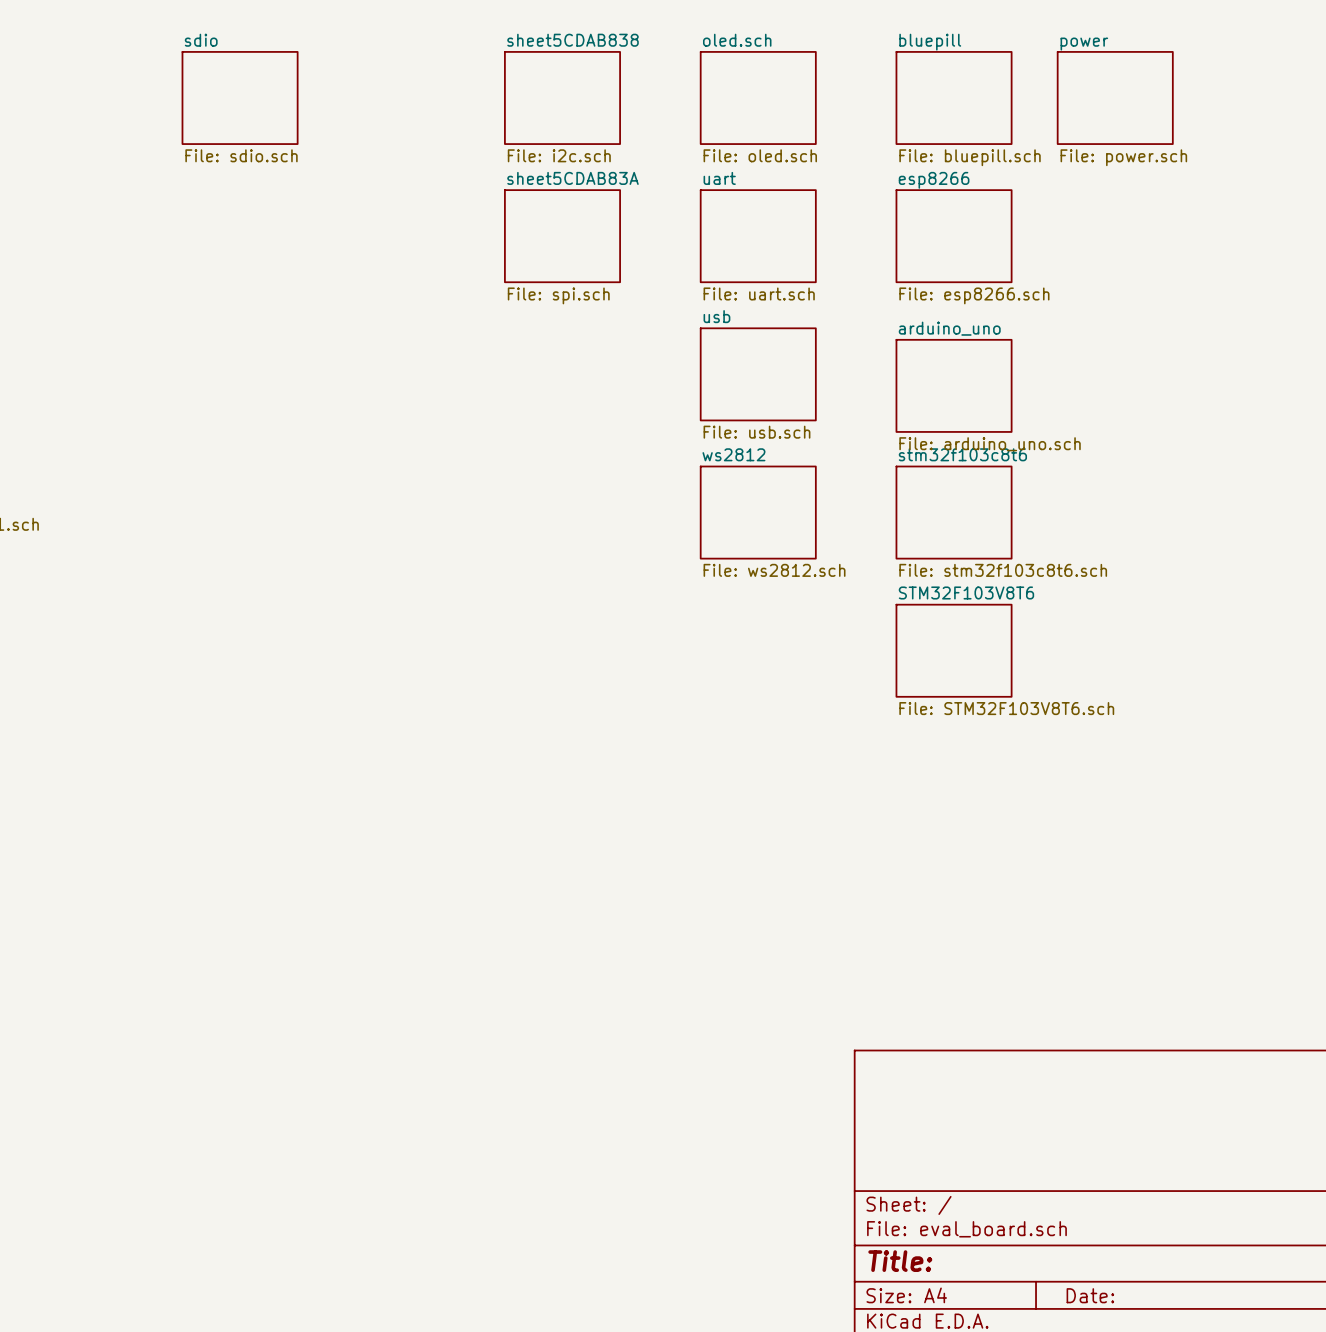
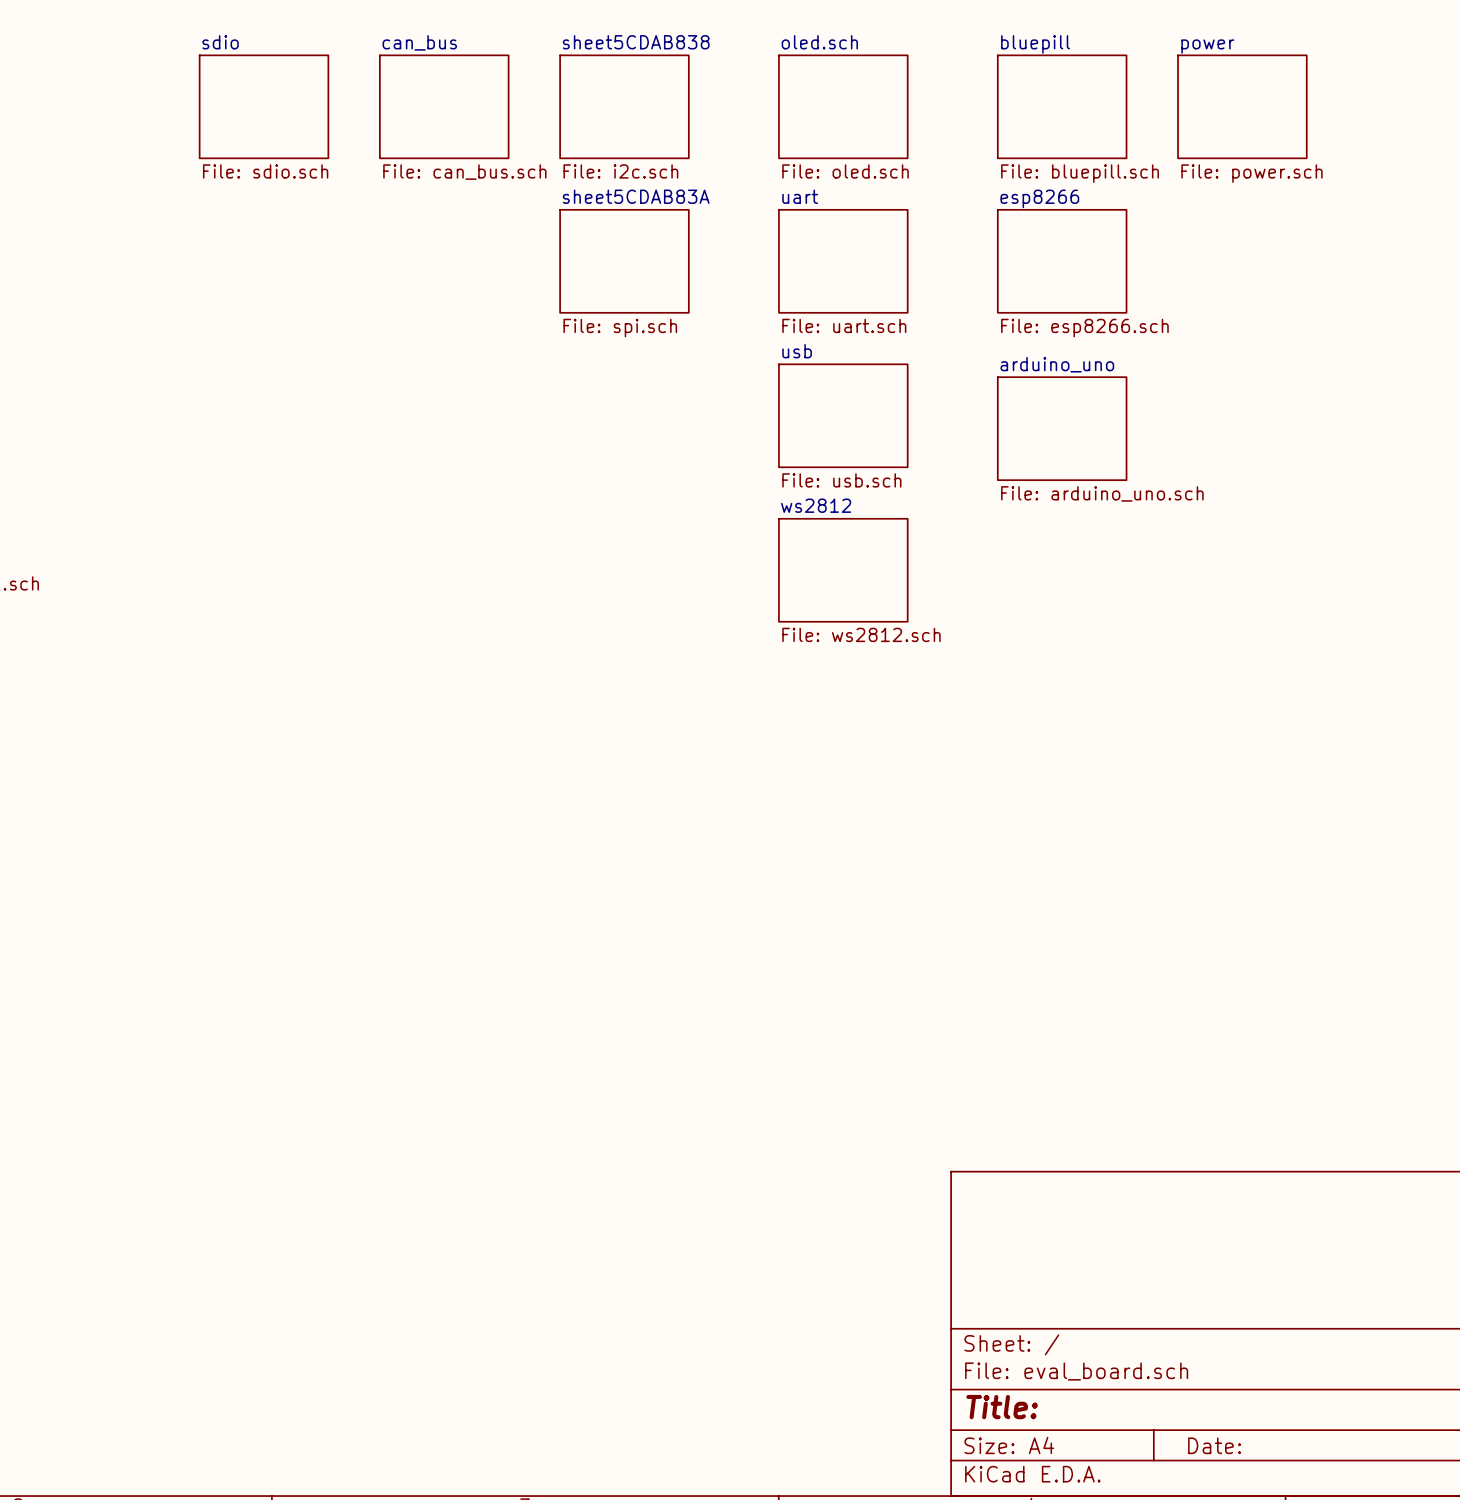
sheet can_bus: none -> File: can_bus.sch (444, 106)
sheet stm32f103c8t6: File: stm32f103c8t6.sch (954, 512) -> none
sheet STM32F103V8T6: File: STM32F103V8T6.sch (954, 650) -> none

